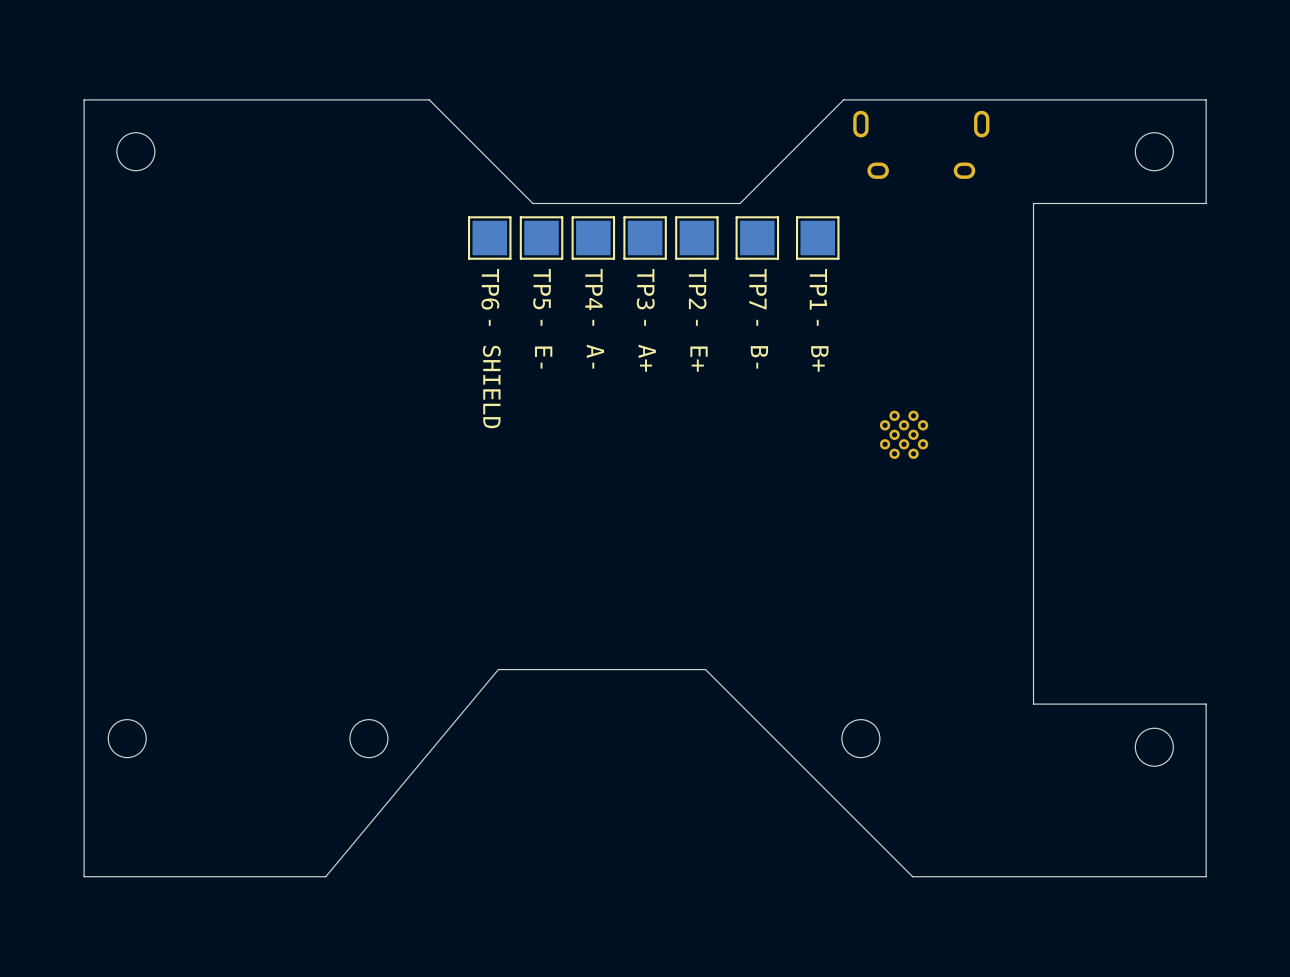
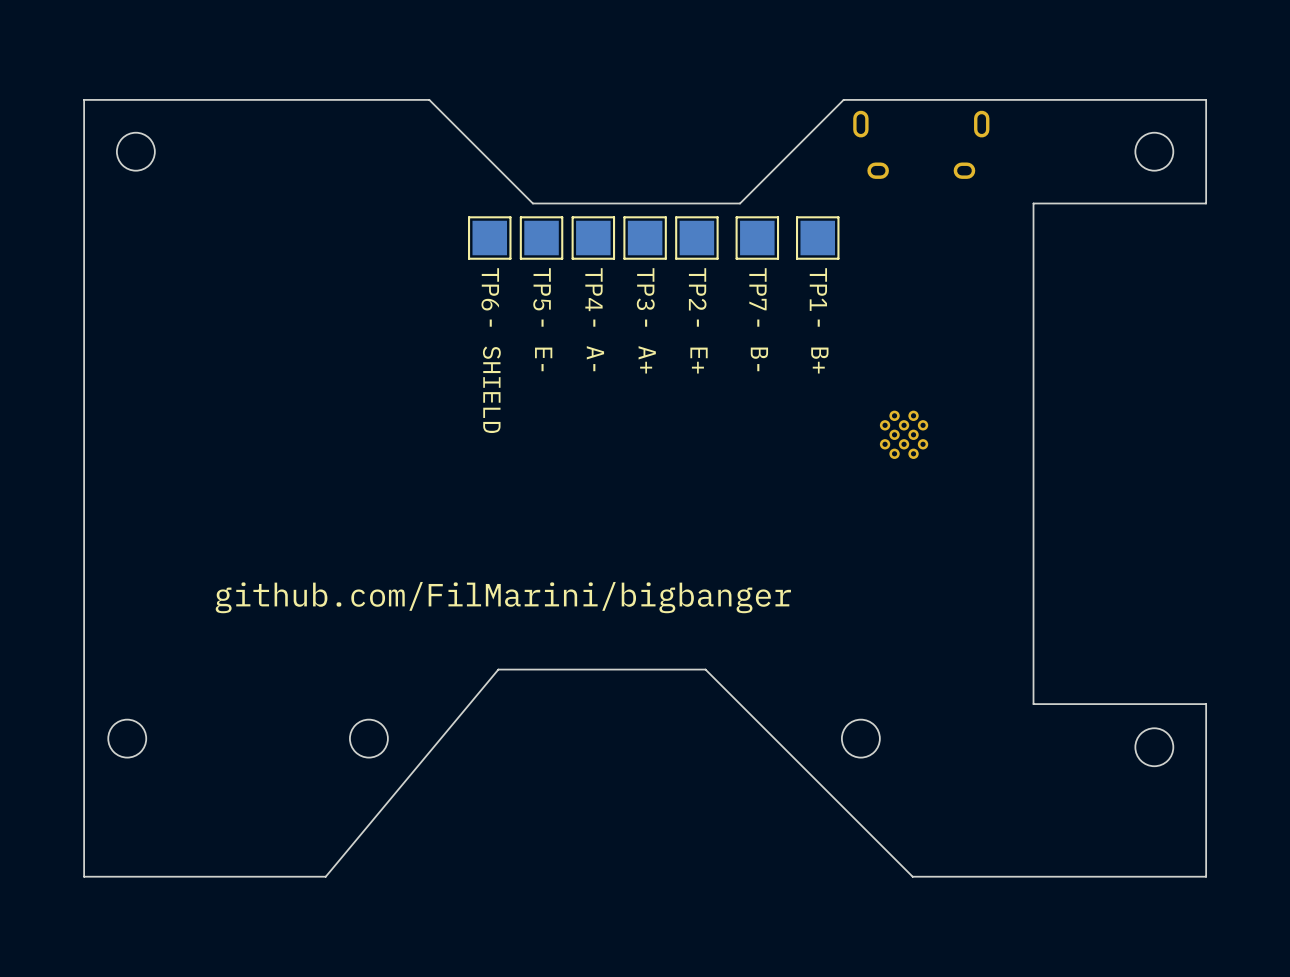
text: none -> github.com/FilMarini/bigbanger (503, 597)

